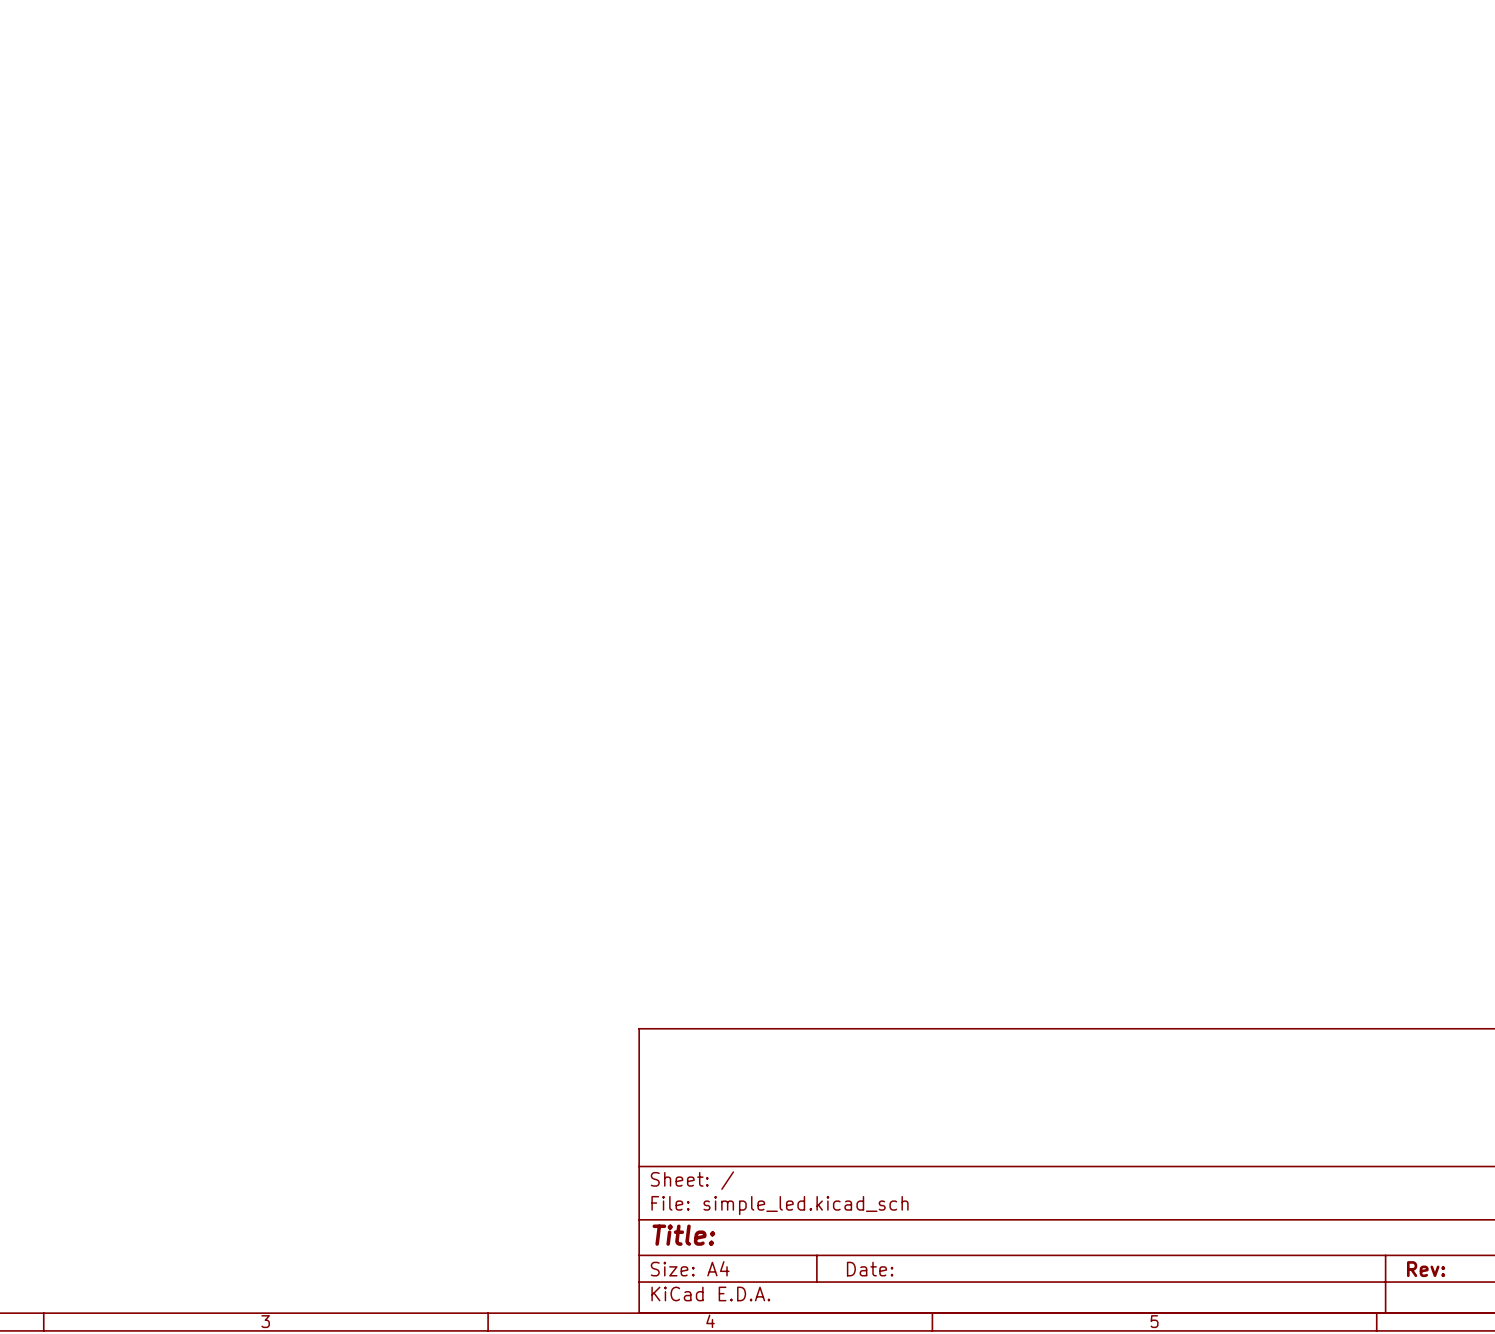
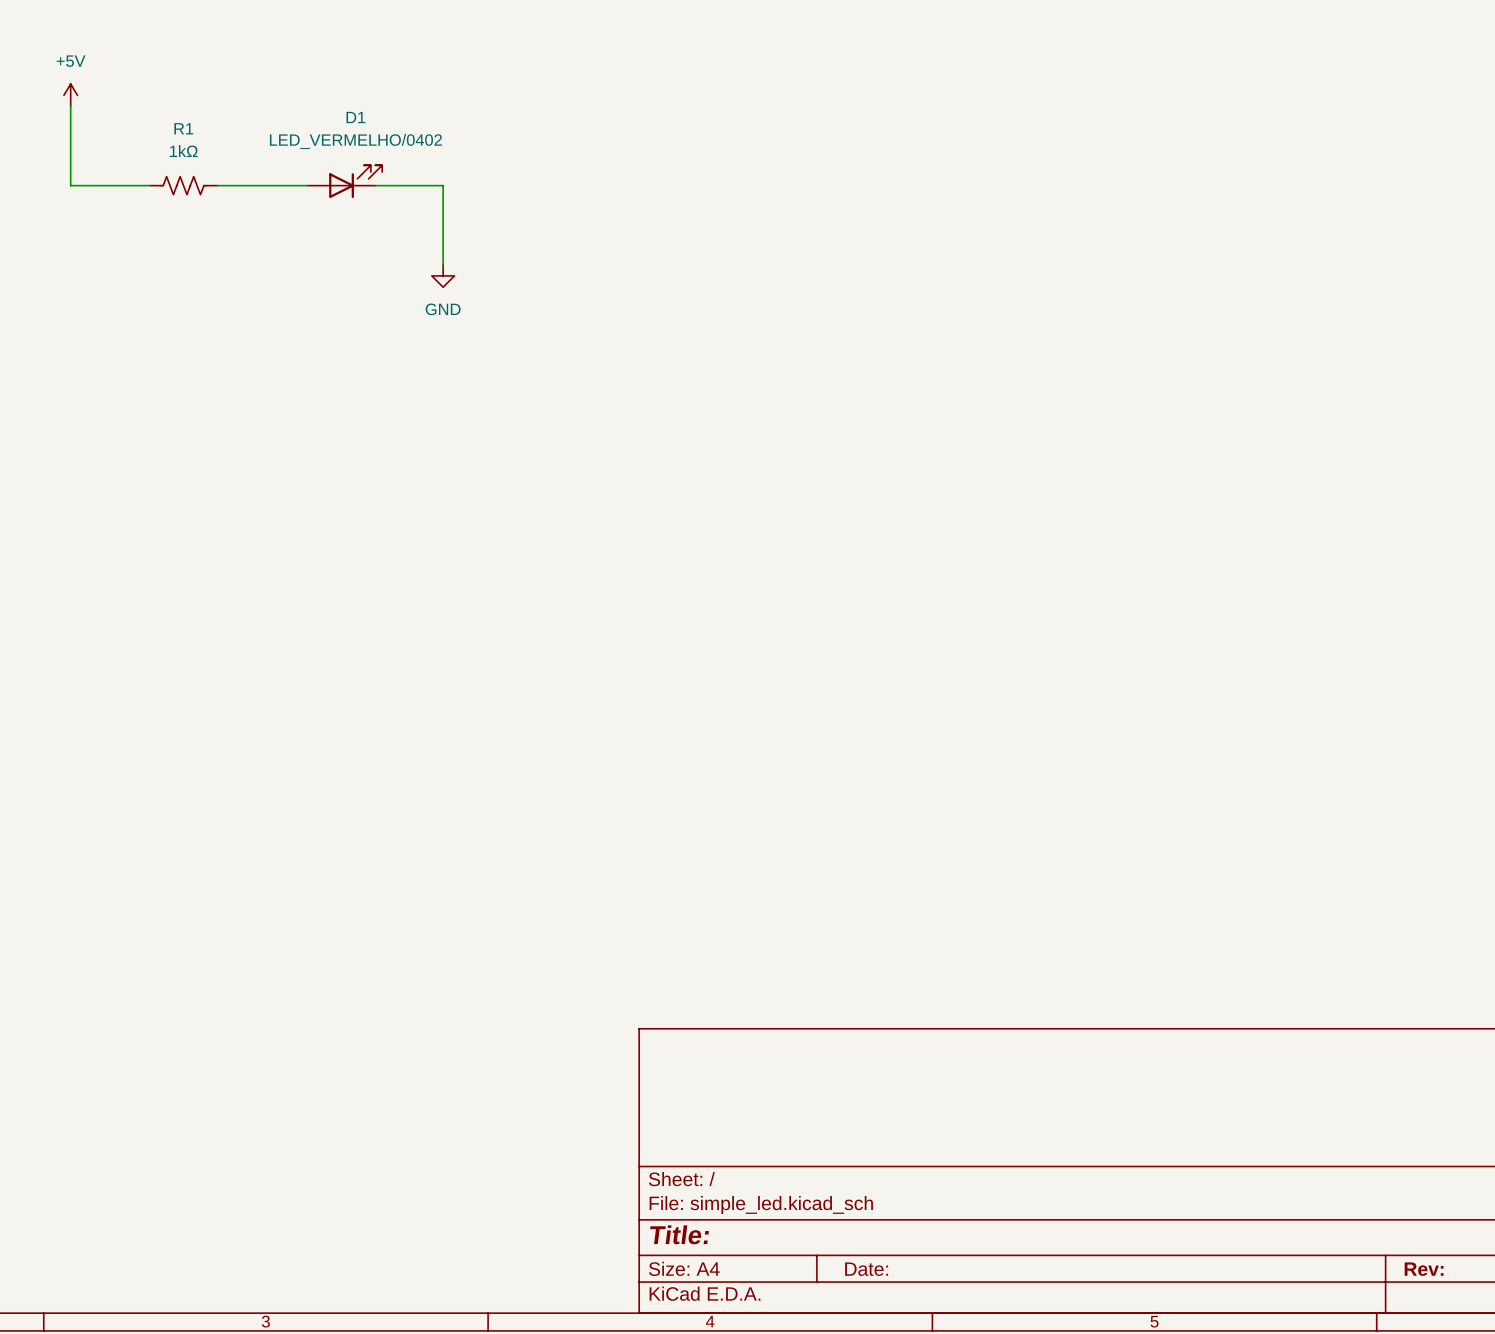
power symbol: none -> +5V (70, 95)
wire: none -> (70, 106) (70, 185) (149, 185)
D1: none -> (344, 181)
R1: none -> (183, 185)
wire: none -> (217, 185) (307, 185)
wire: none -> (375, 185) (443, 185) (443, 264)
power symbol: none -> GND (443, 275)

